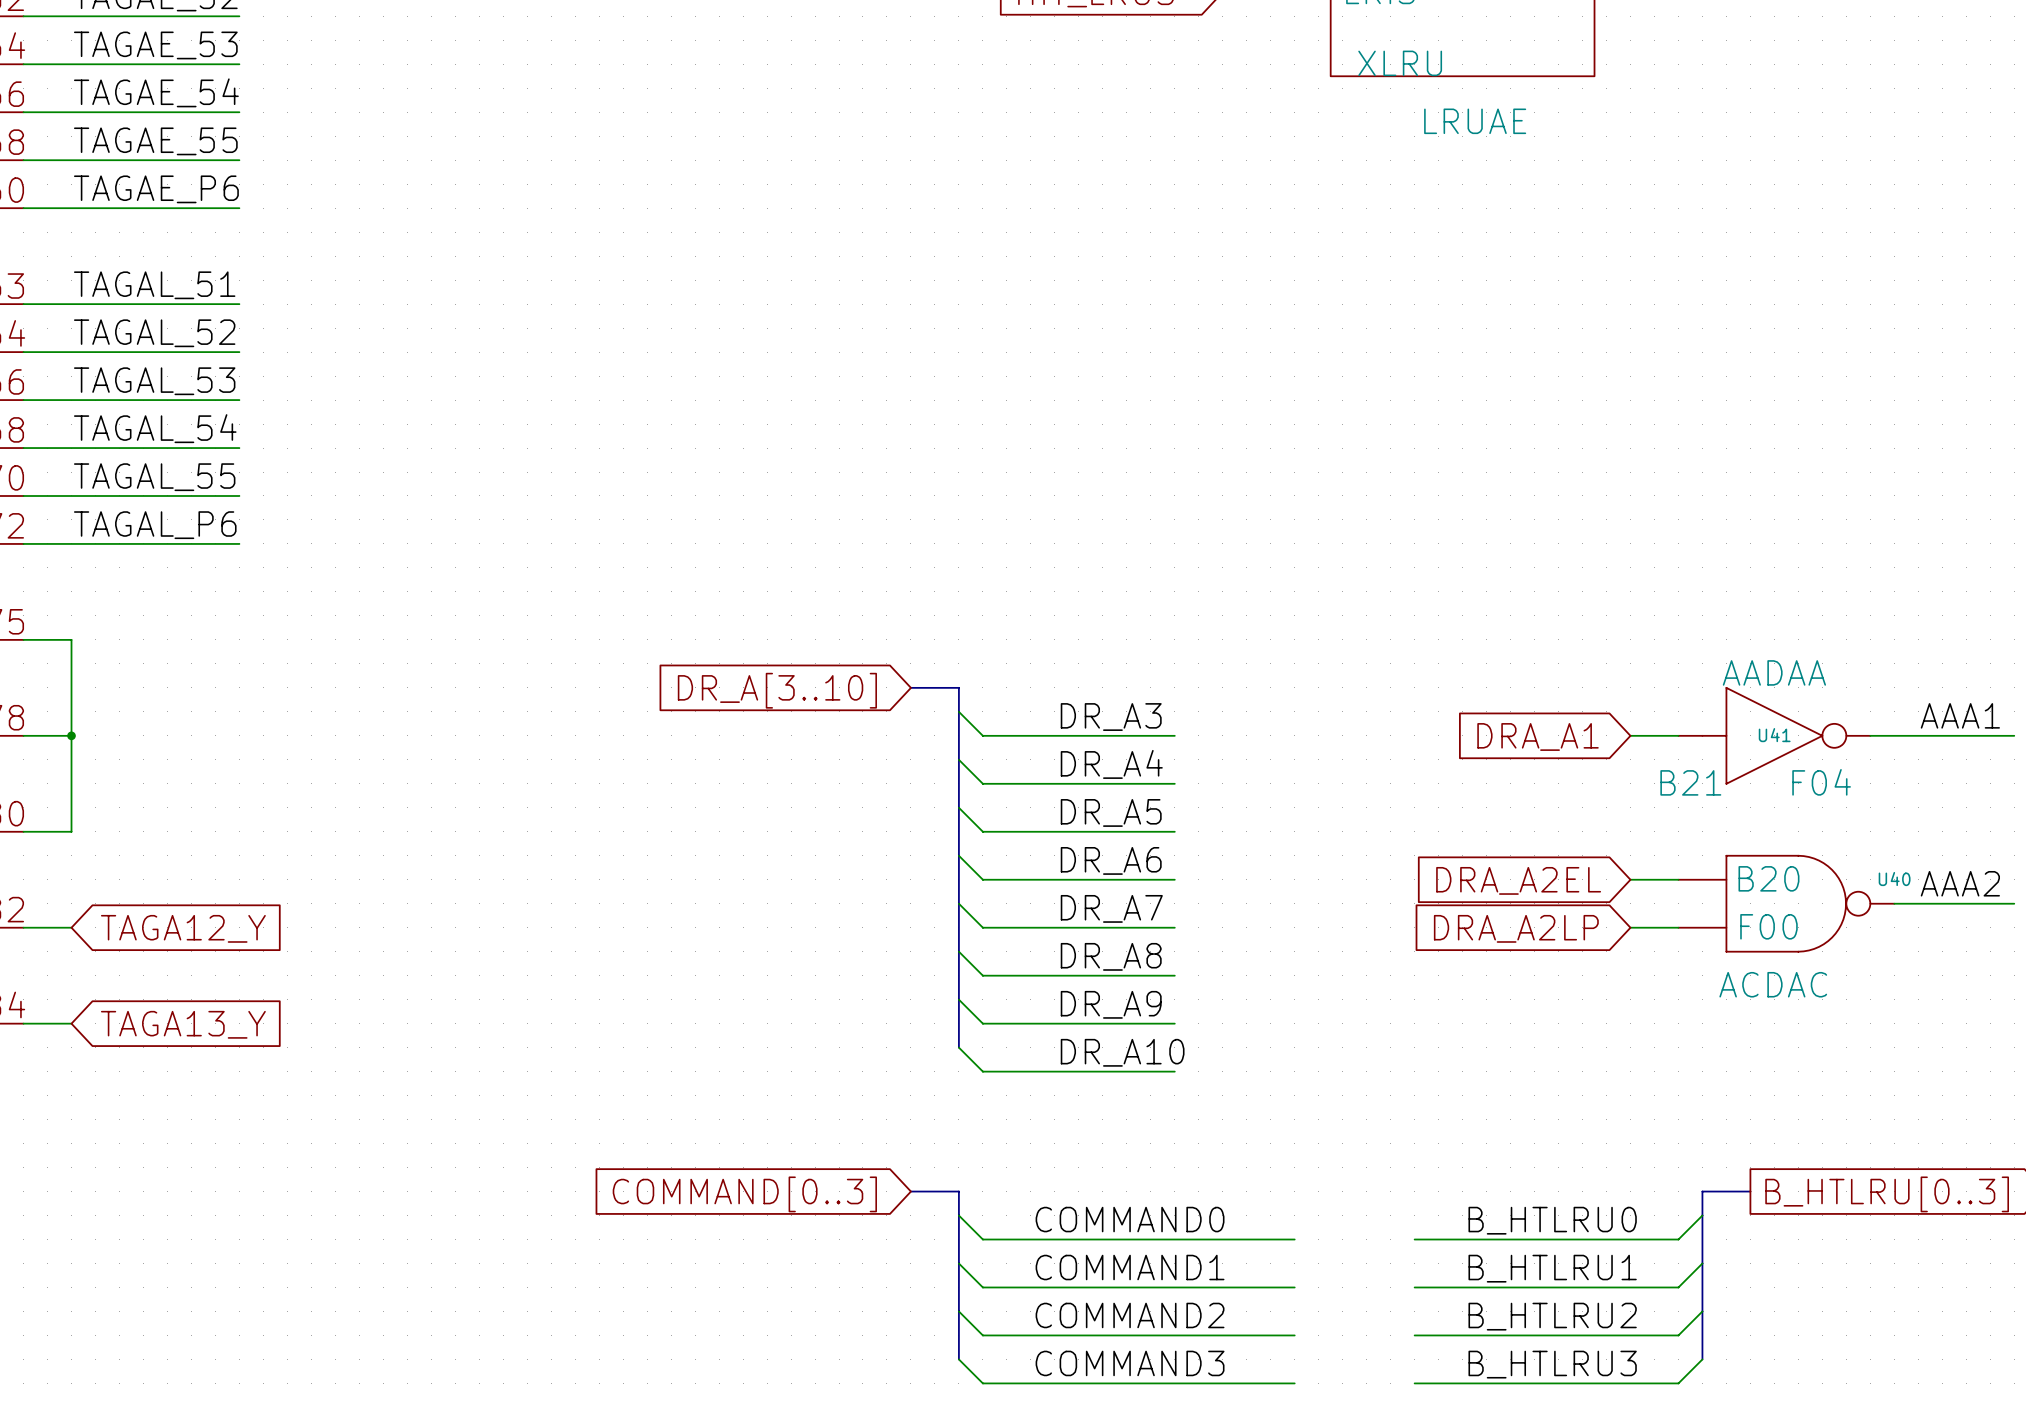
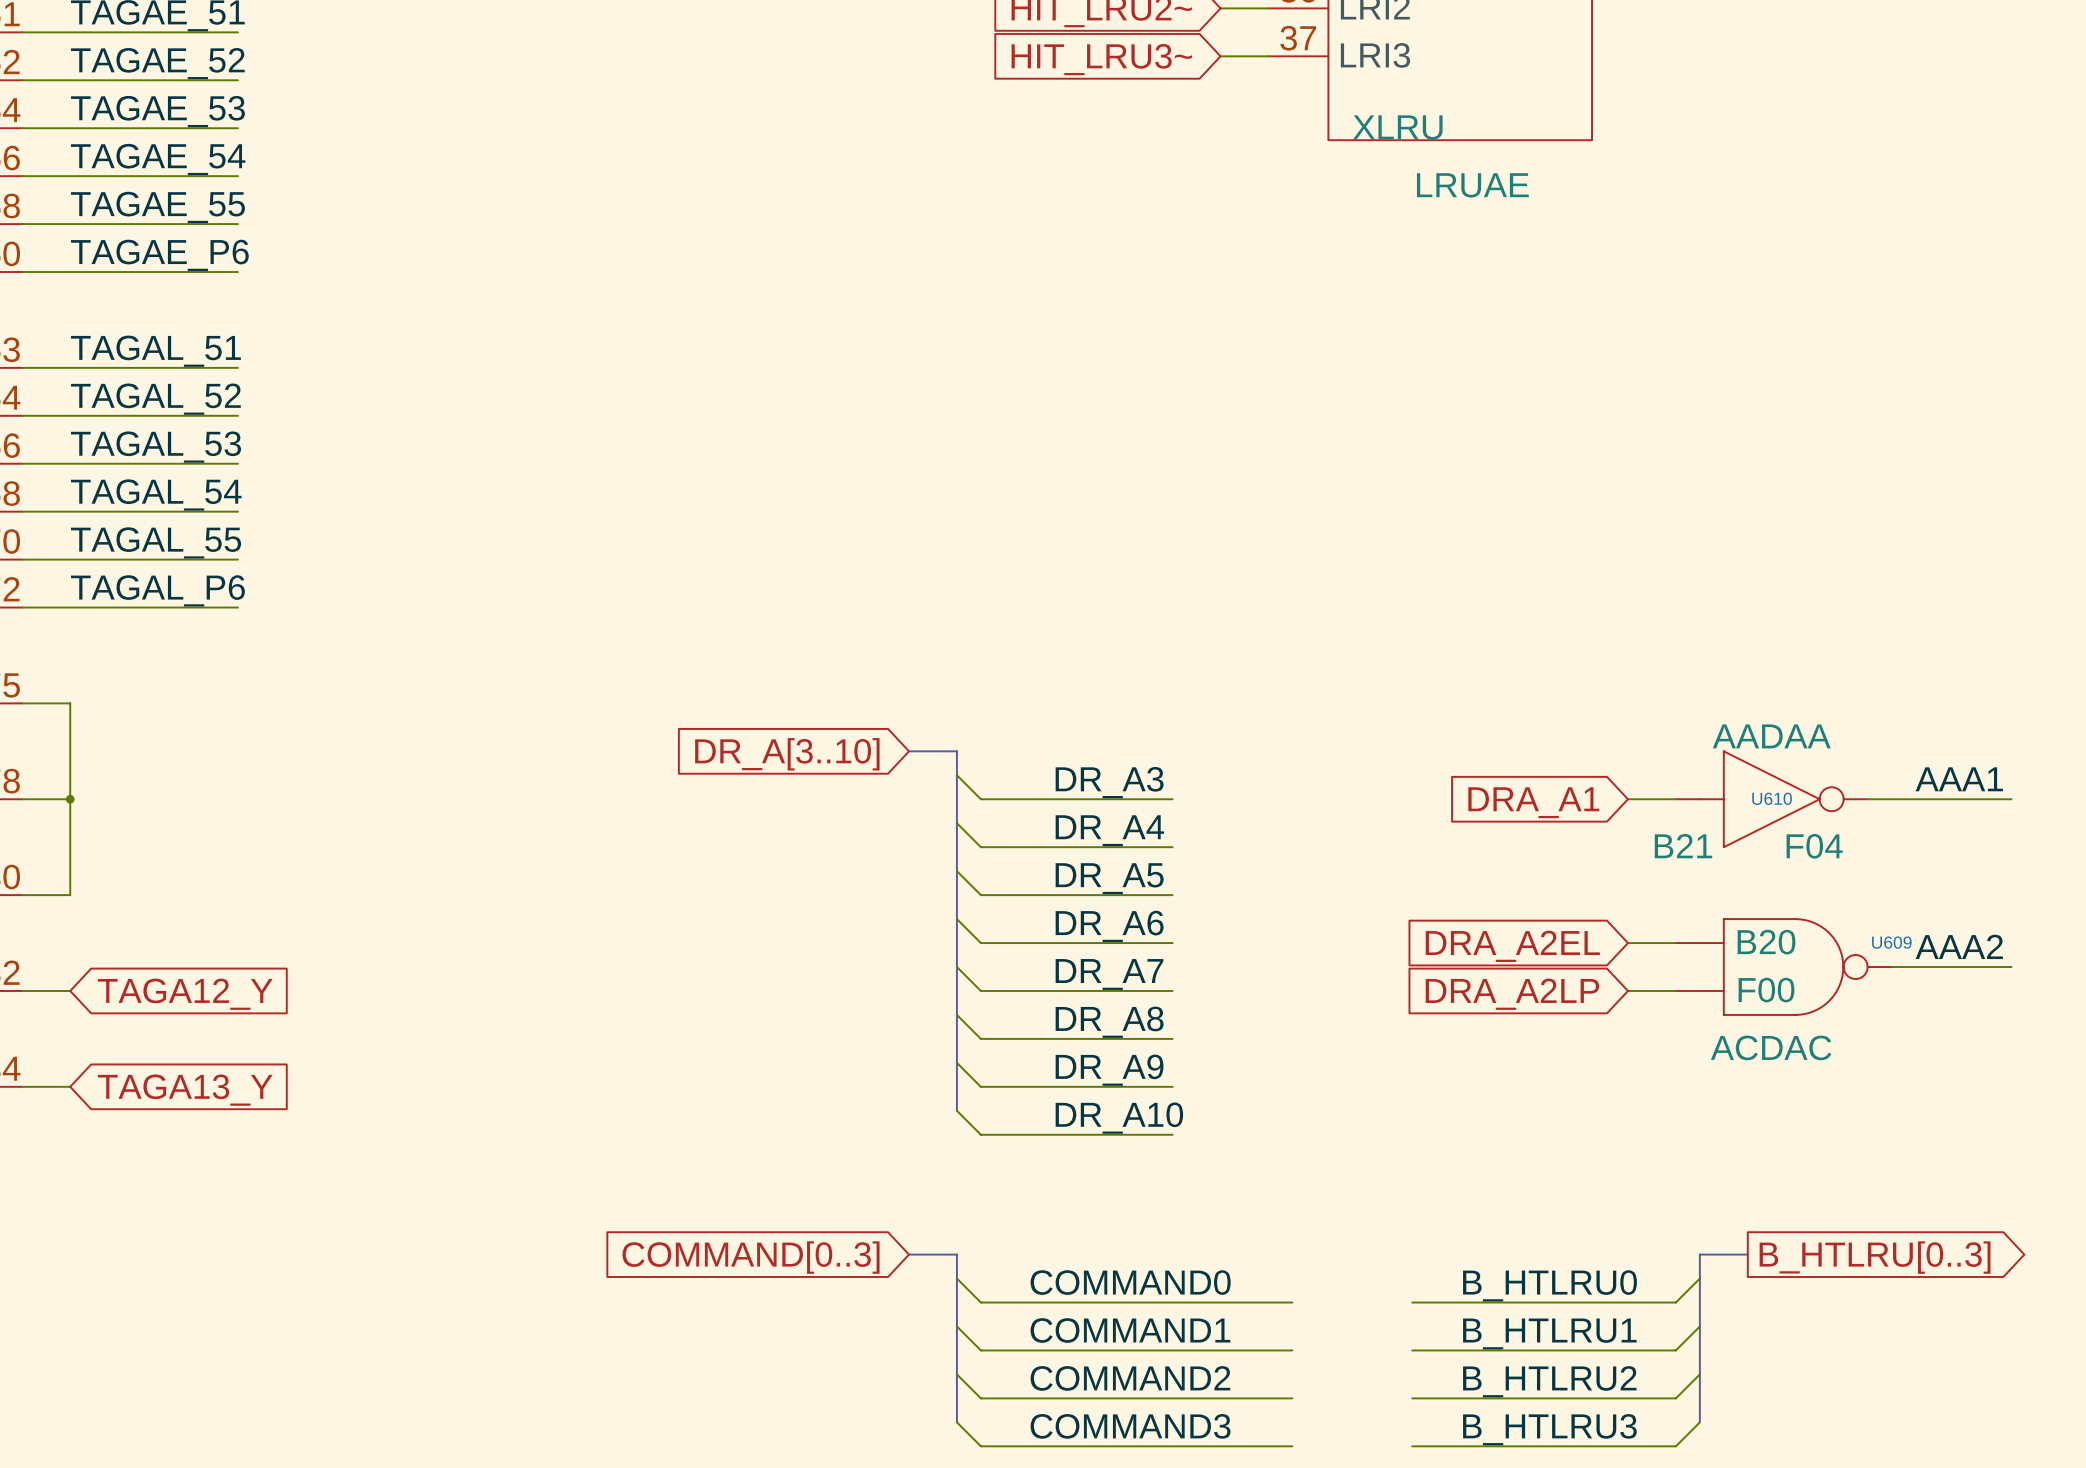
U41 name: U41 (1774, 735) -> U610 (1772, 798)
U40 name: U40 (1894, 879) -> U609 (1891, 942)

